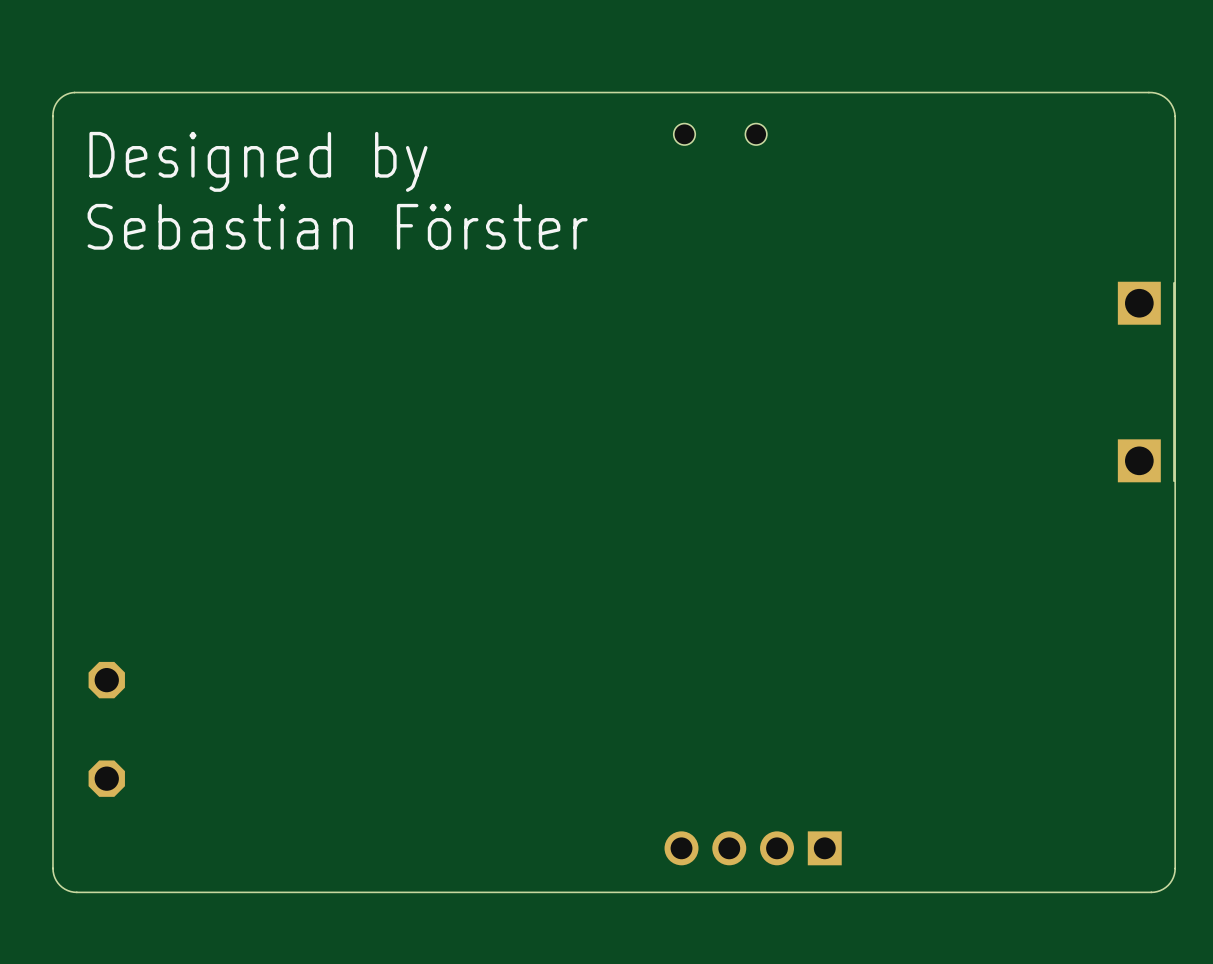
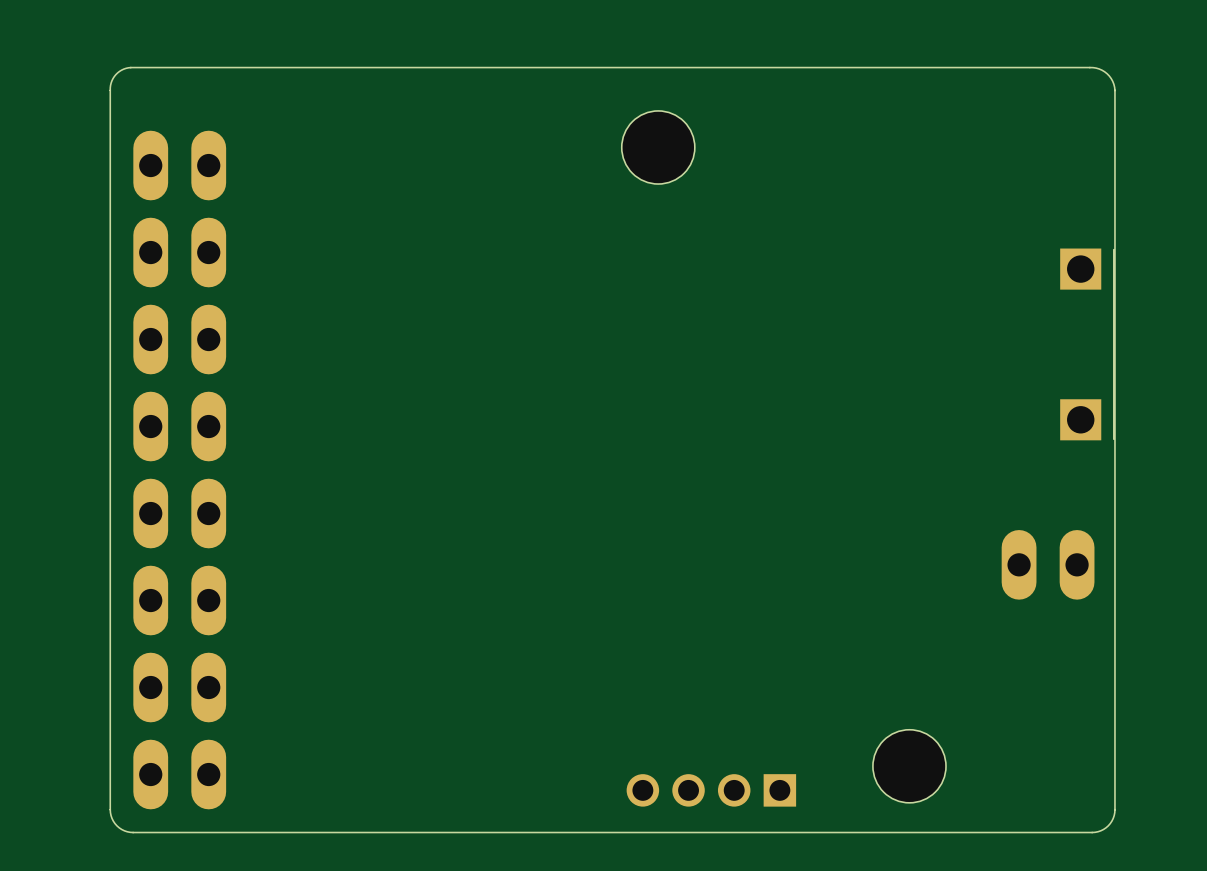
board edge: (146, 92) (71, 92) (60, 98) (53, 111) (52, 868) (57, 883) (70, 891) (148, 892) -> (130, 67) (117, 73) (111, 80) (110, 87) (110, 809) (112, 818) (116, 825) (124, 830) (133, 832)
part: (720, 134) -> none
text: Designed by (258, 161) -> none
hole: none -> (658, 147)
part: none -> (179, 165)
text: Sebastian Förster (337, 226) -> none
part: none -> (179, 252)
part: none -> (179, 339)
part: none -> (179, 426)
part: none -> (179, 513)
part: none -> (1048, 564)
part: none -> (179, 600)
part: (106, 680) -> none
part: none -> (179, 687)
part: (106, 778) -> none
hole: none -> (909, 766)
part: none -> (179, 774)

